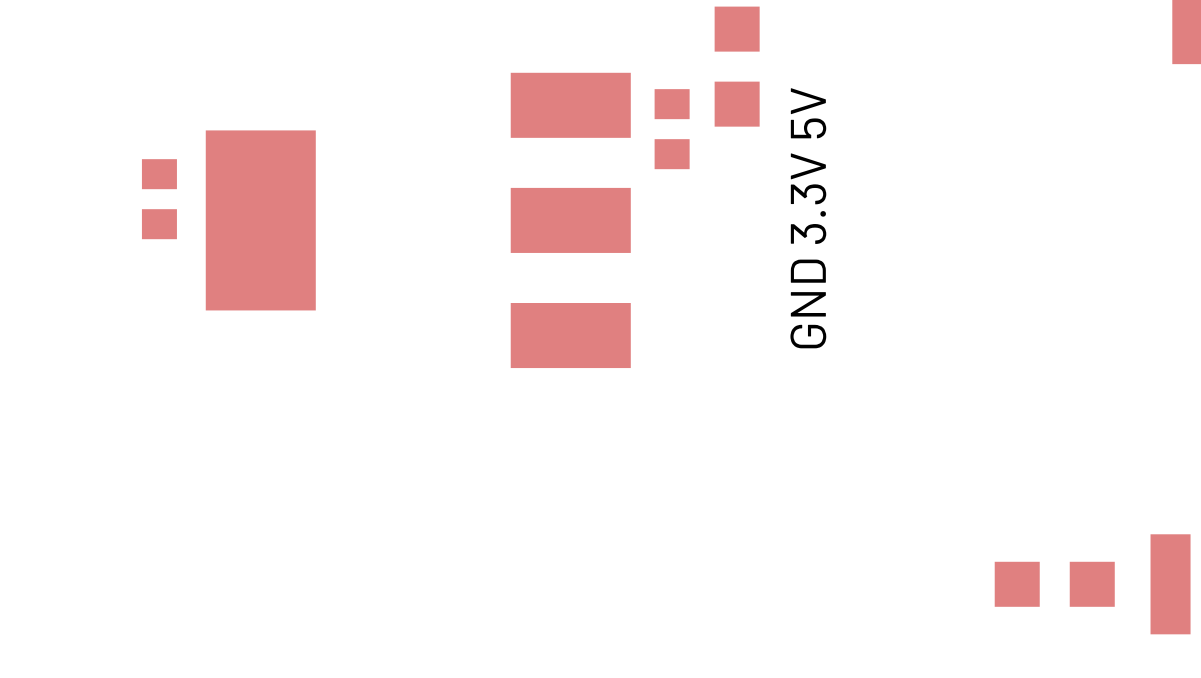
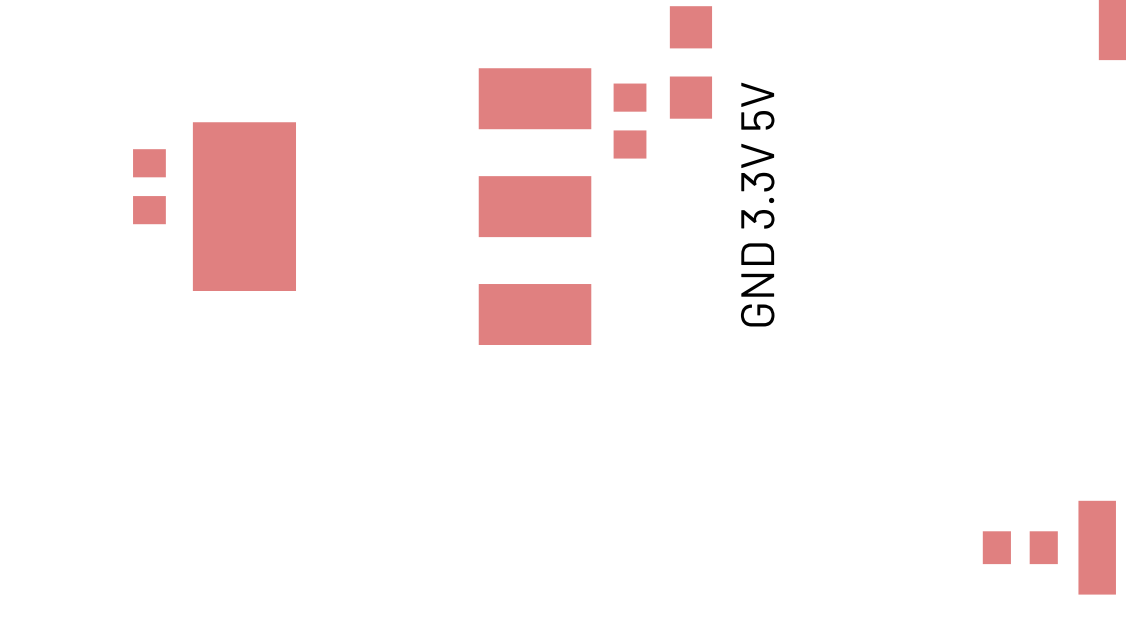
part footprint: [994, 561, 1115, 607] -> [982, 531, 1058, 565]

